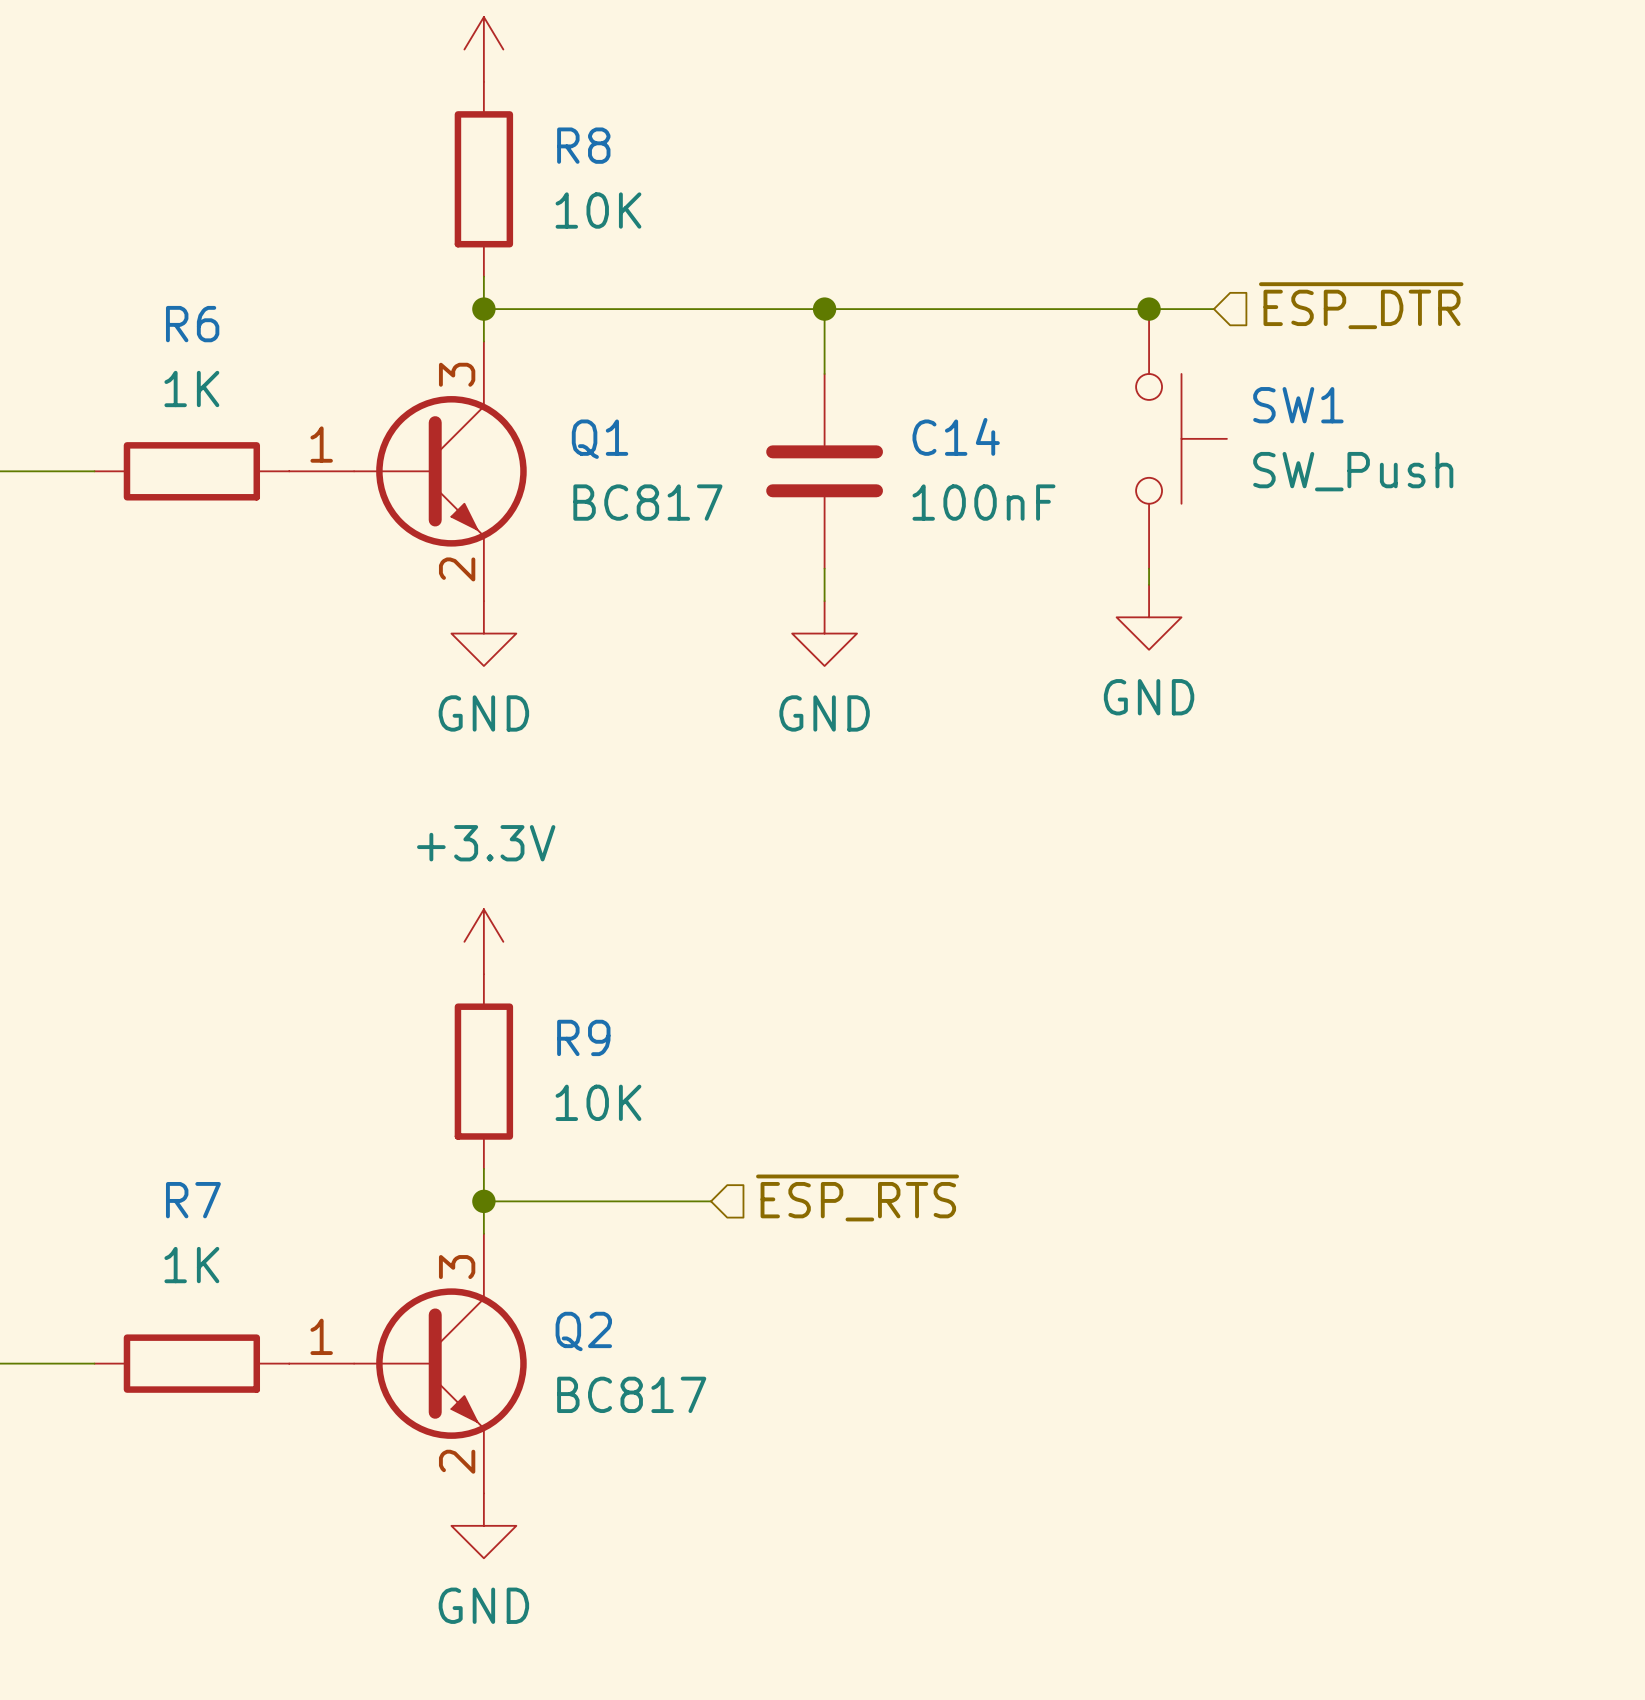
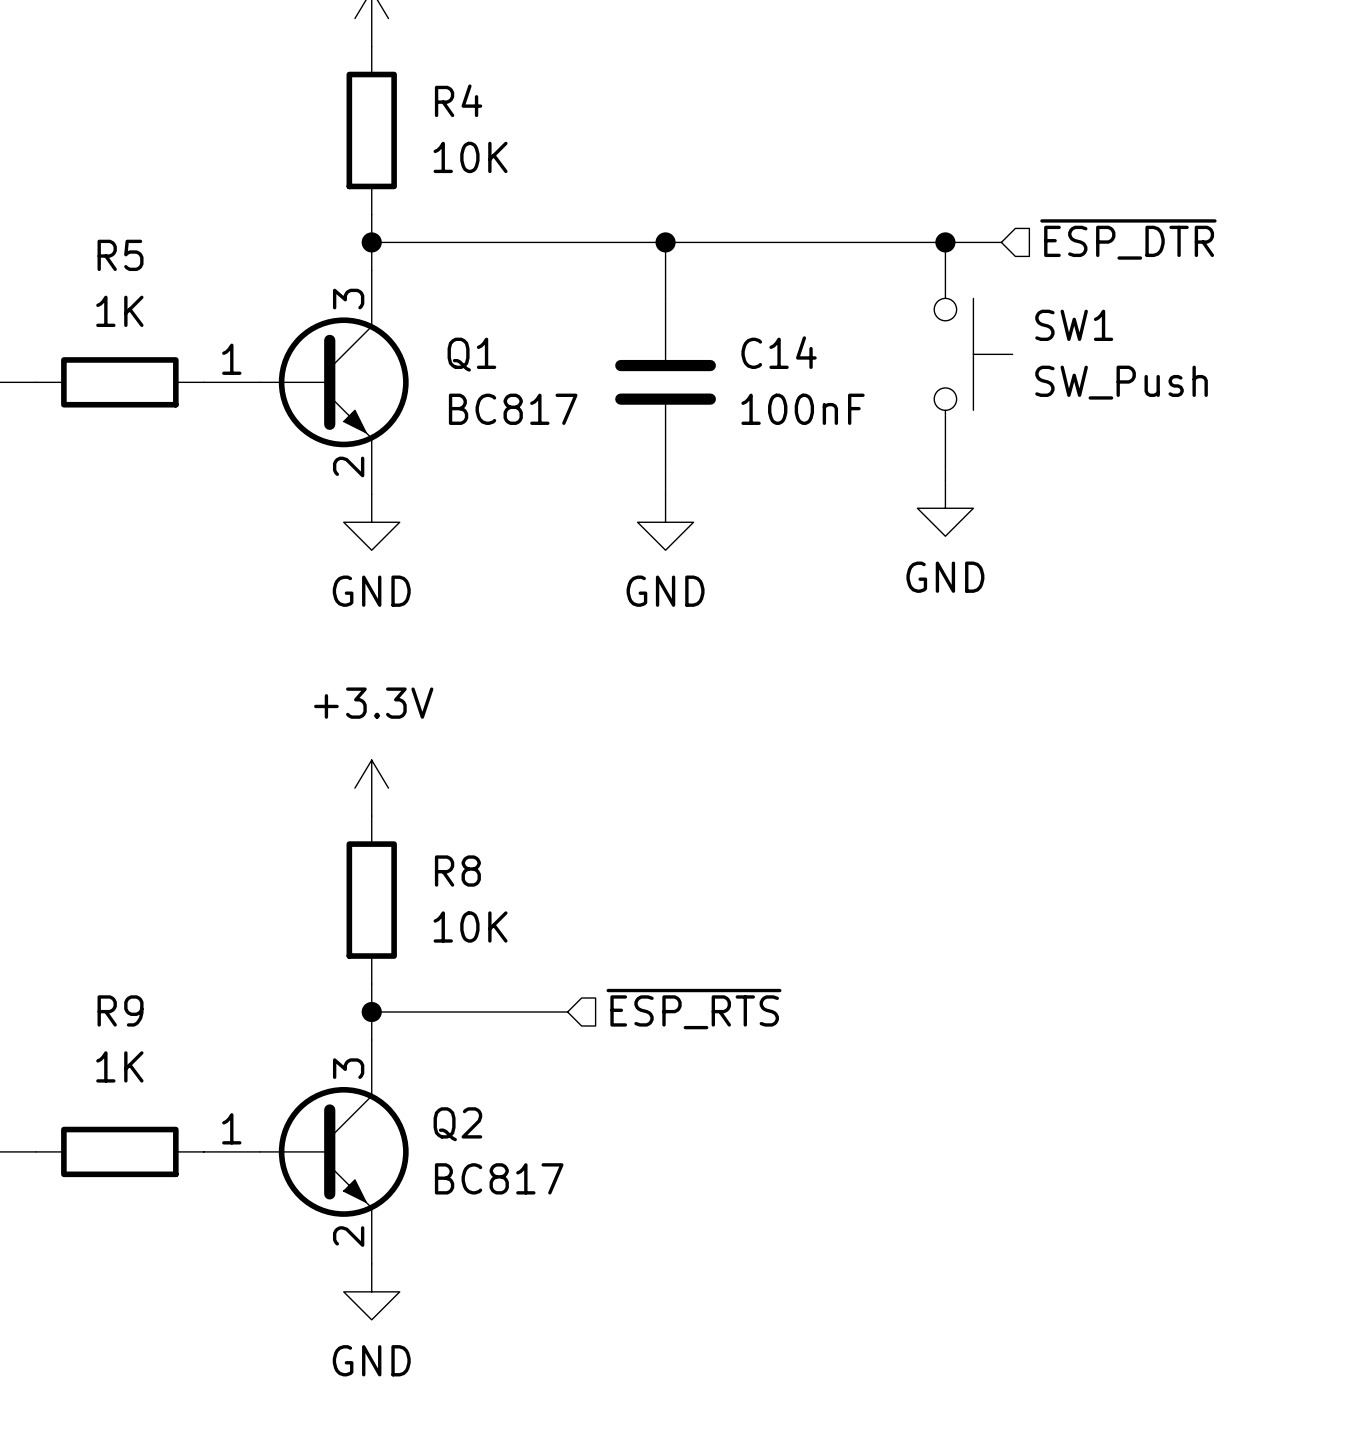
R8 name: R8 (583, 145) -> R4 (458, 100)
R6 name: R6 (192, 324) -> R5 (120, 255)
R9 name: R9 (583, 1037) -> R8 (457, 871)
R7 name: R7 (193, 1200) -> R9 (120, 1010)

